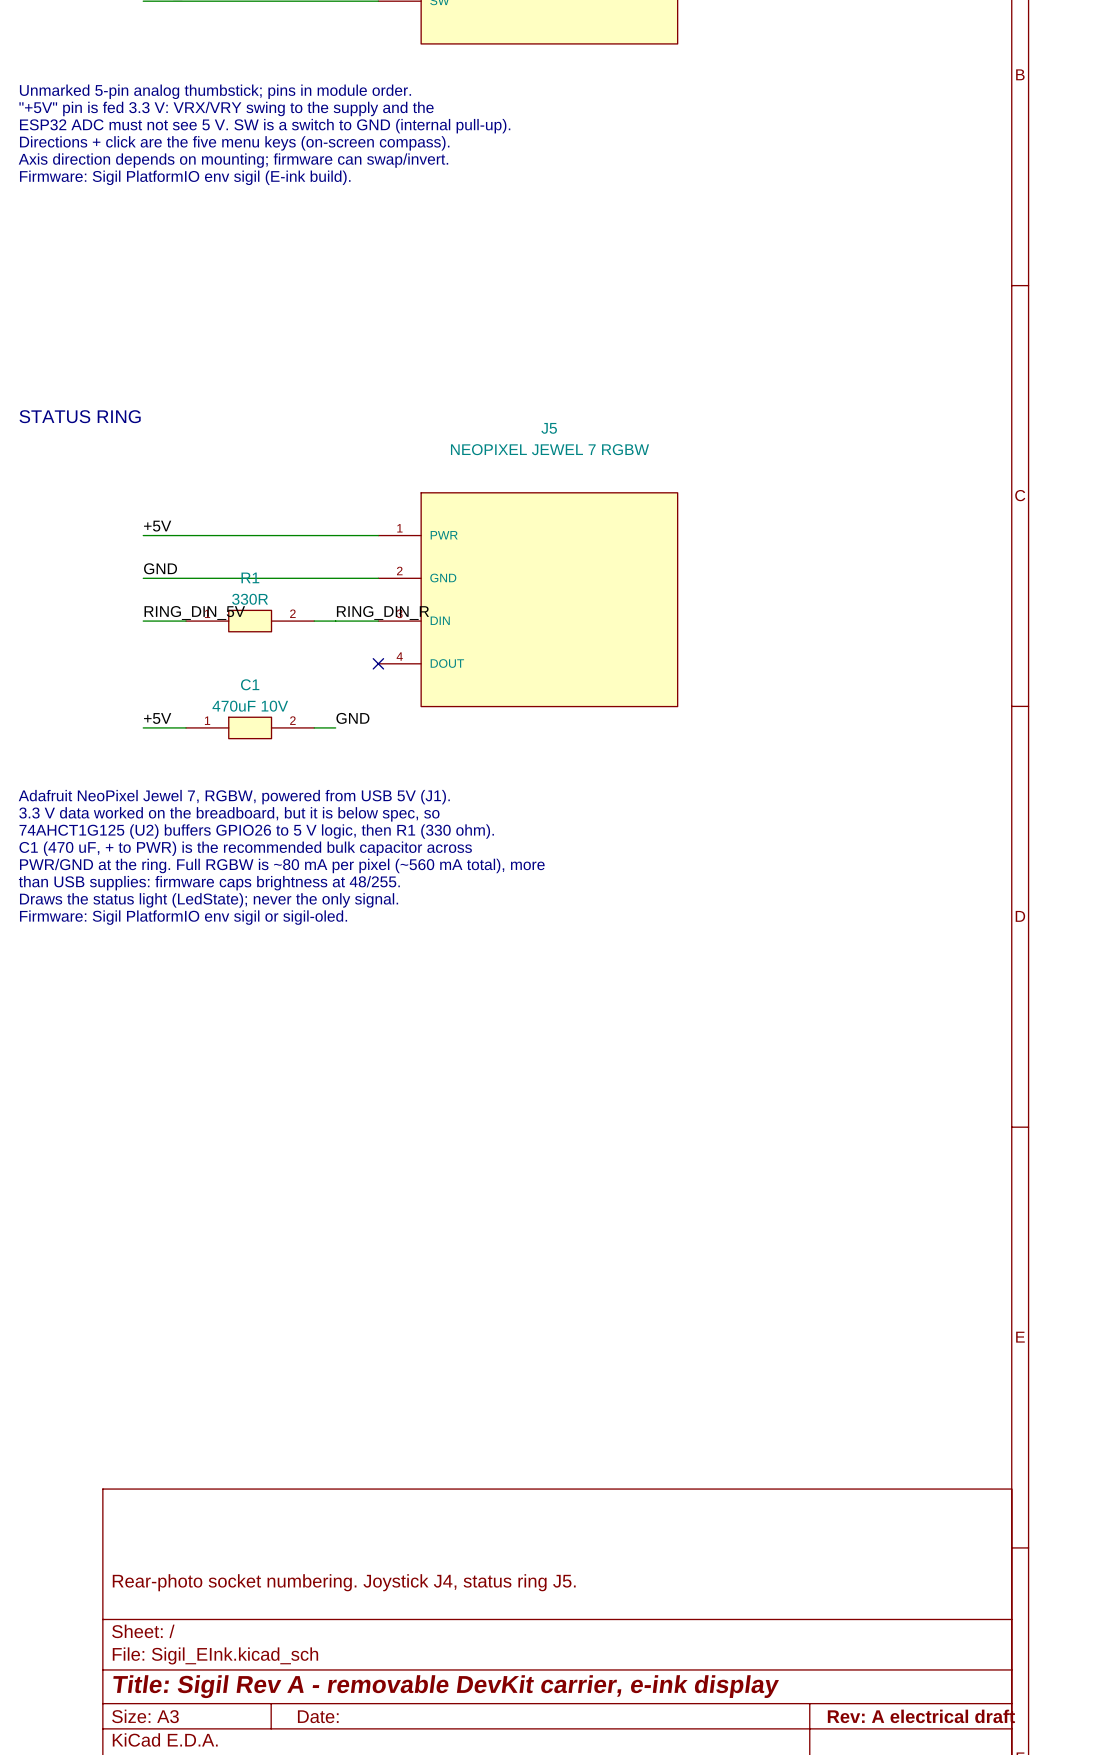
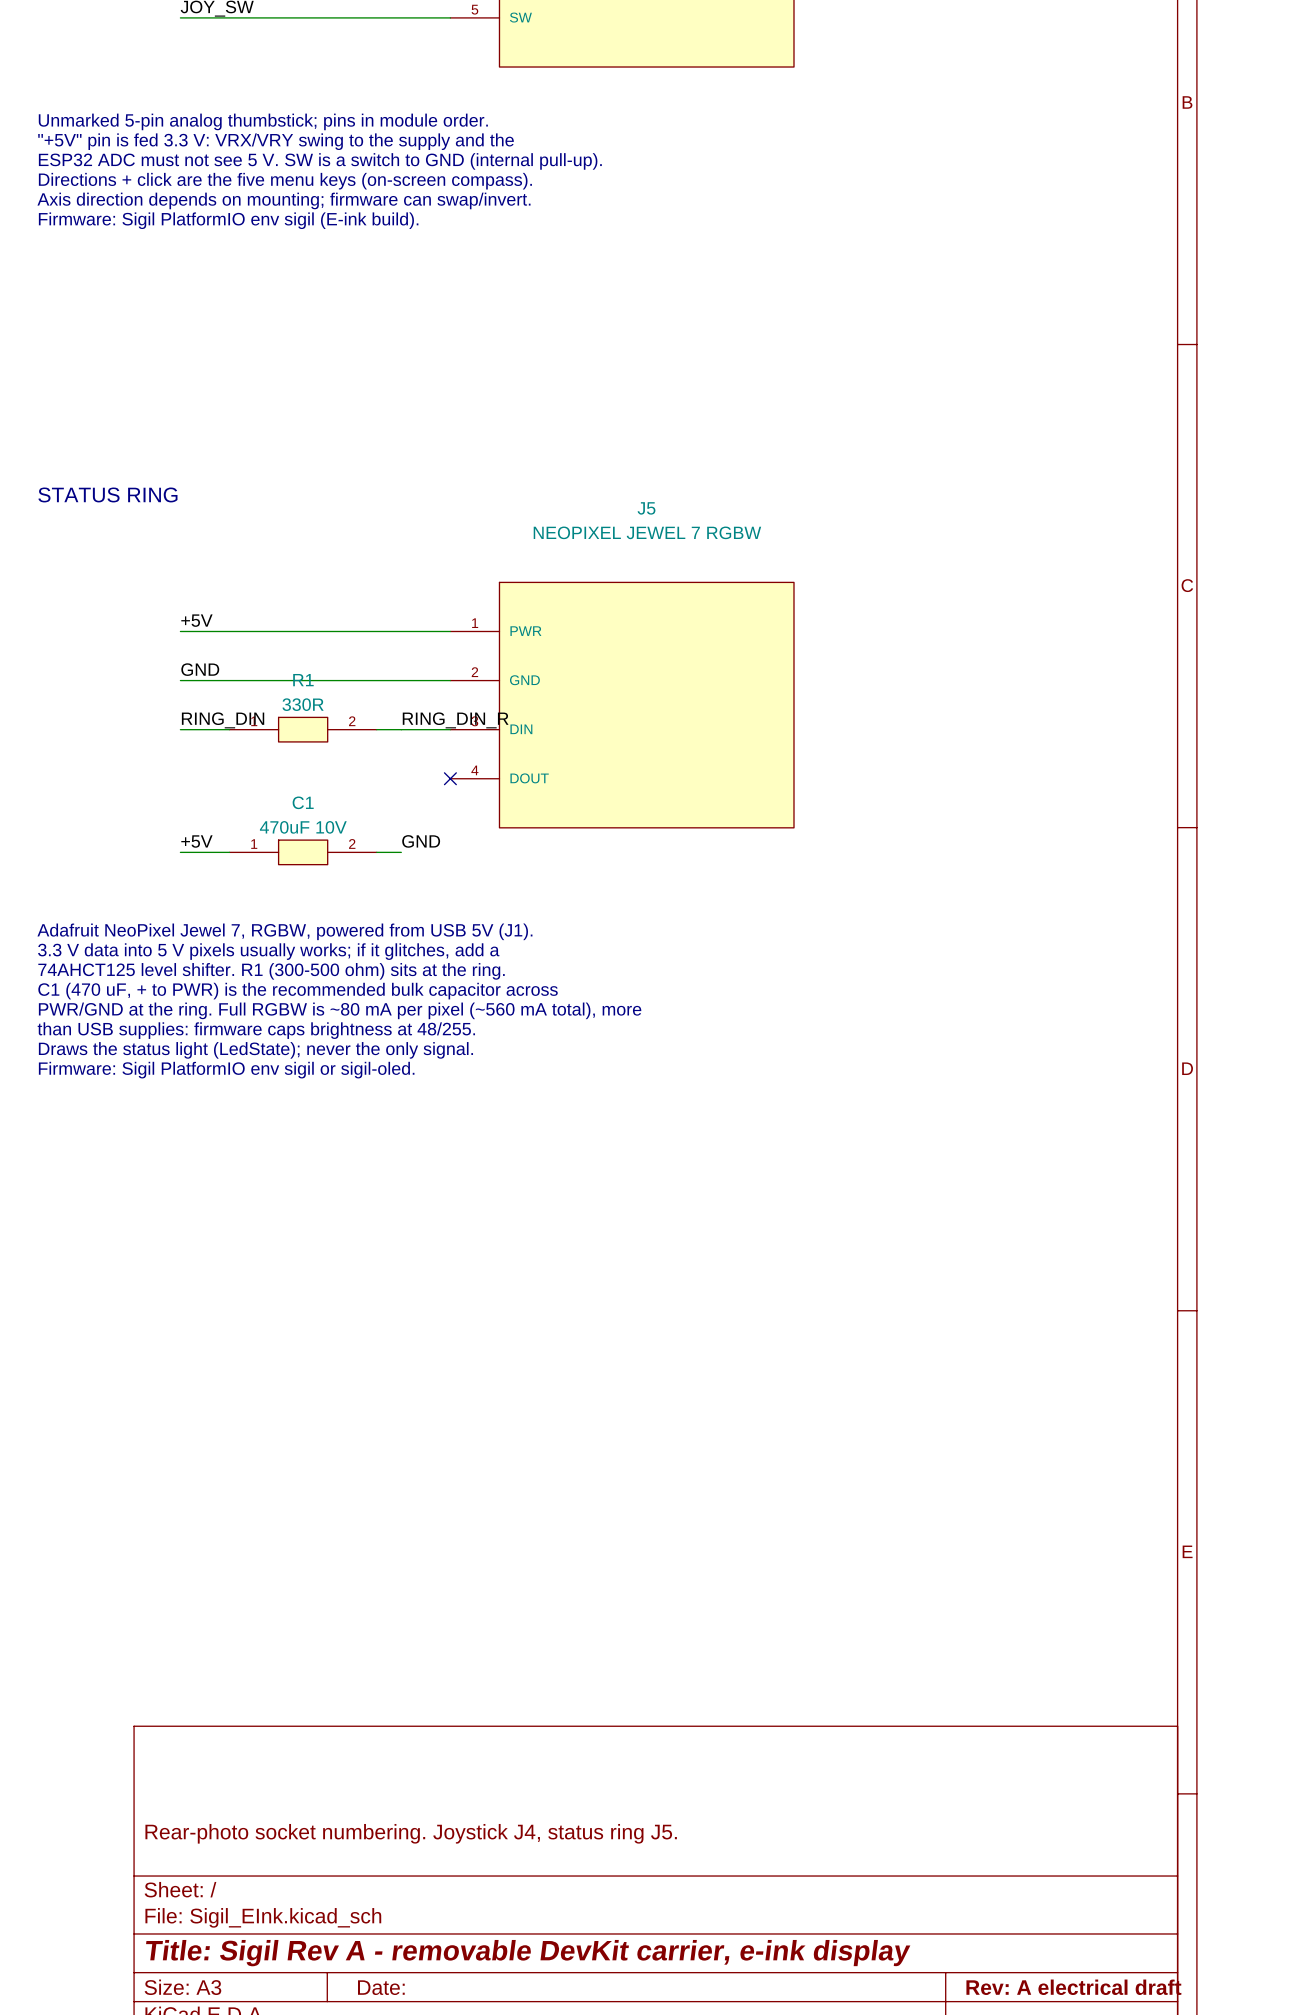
label: RING_DIN_5V (194, 612) -> RING_DIN (223, 720)
text: 3.3 V data worked on the breadboard, but it is below spec, so (229, 814) -> 3.3 V data into 5 V pixels usually works; if it glitches, add a (268, 951)
text: 74AHCT1G125 (U2) buffers GPIO26 to 5 V logic, then R1 (330 ohm). (256, 831) -> 74AHCT125 level shifter. R1 (300-500 ohm) sits at the ring. (271, 971)

